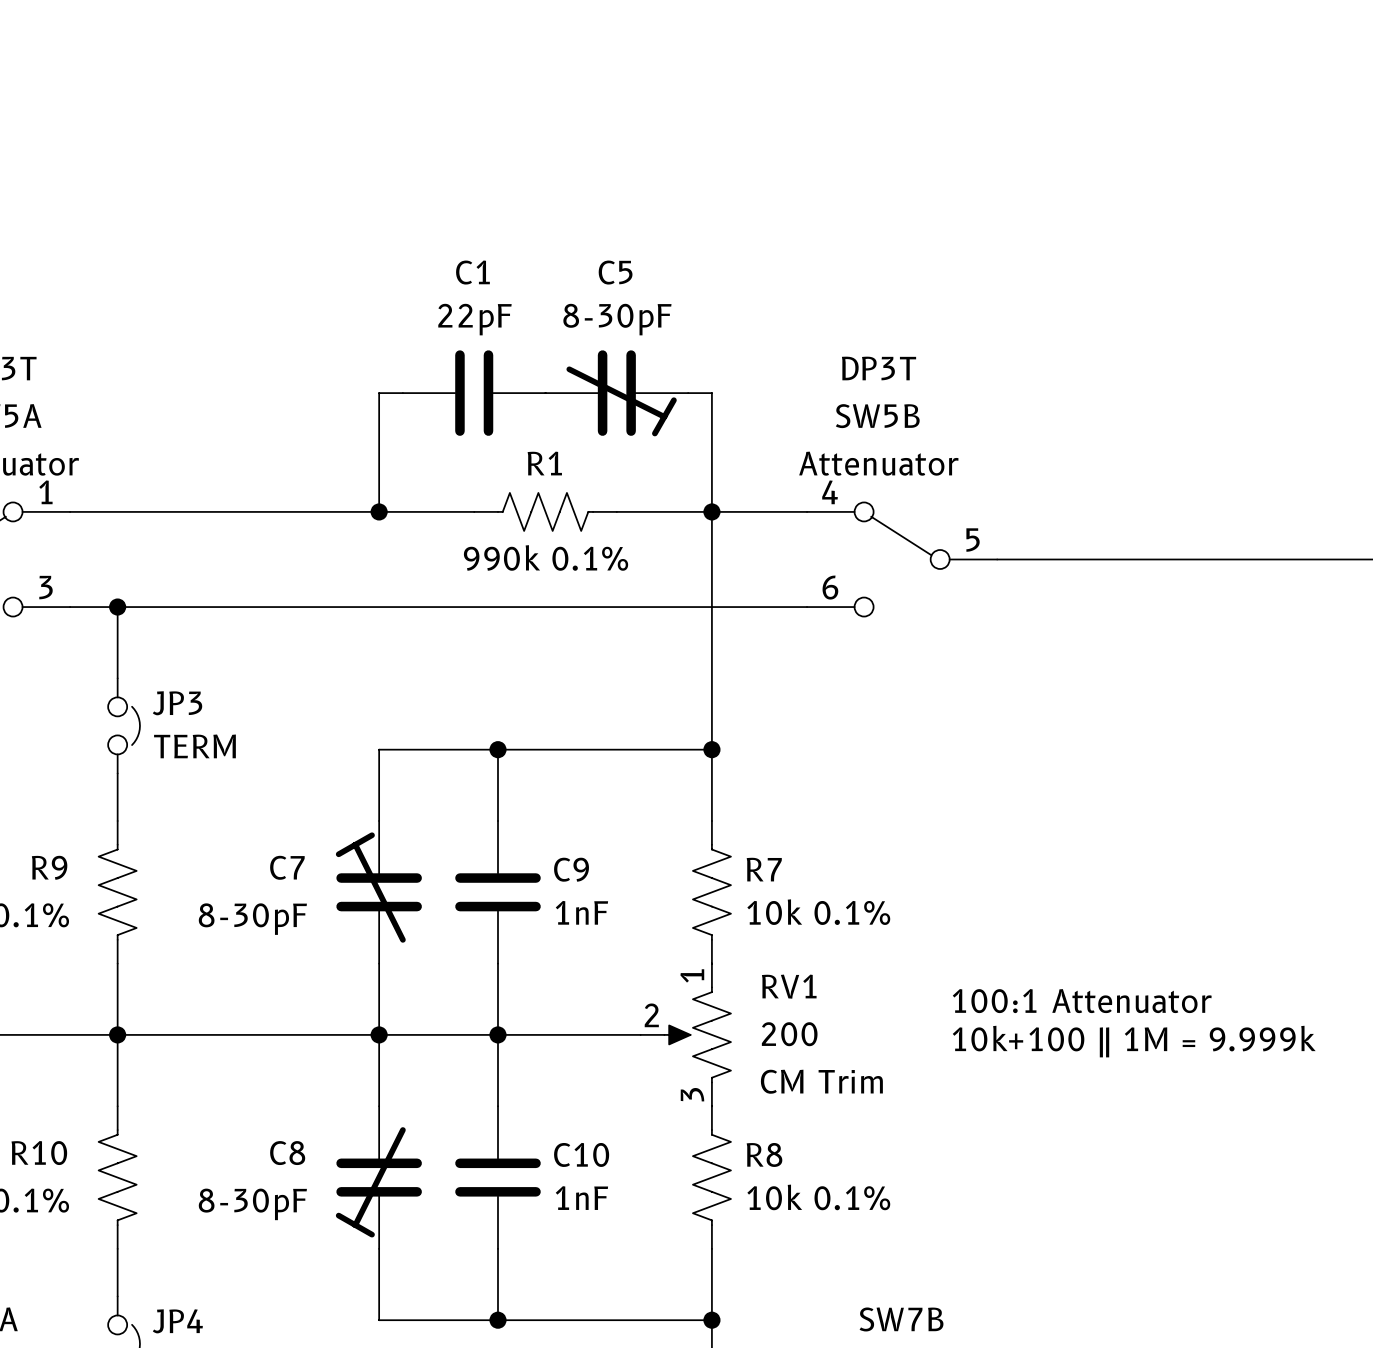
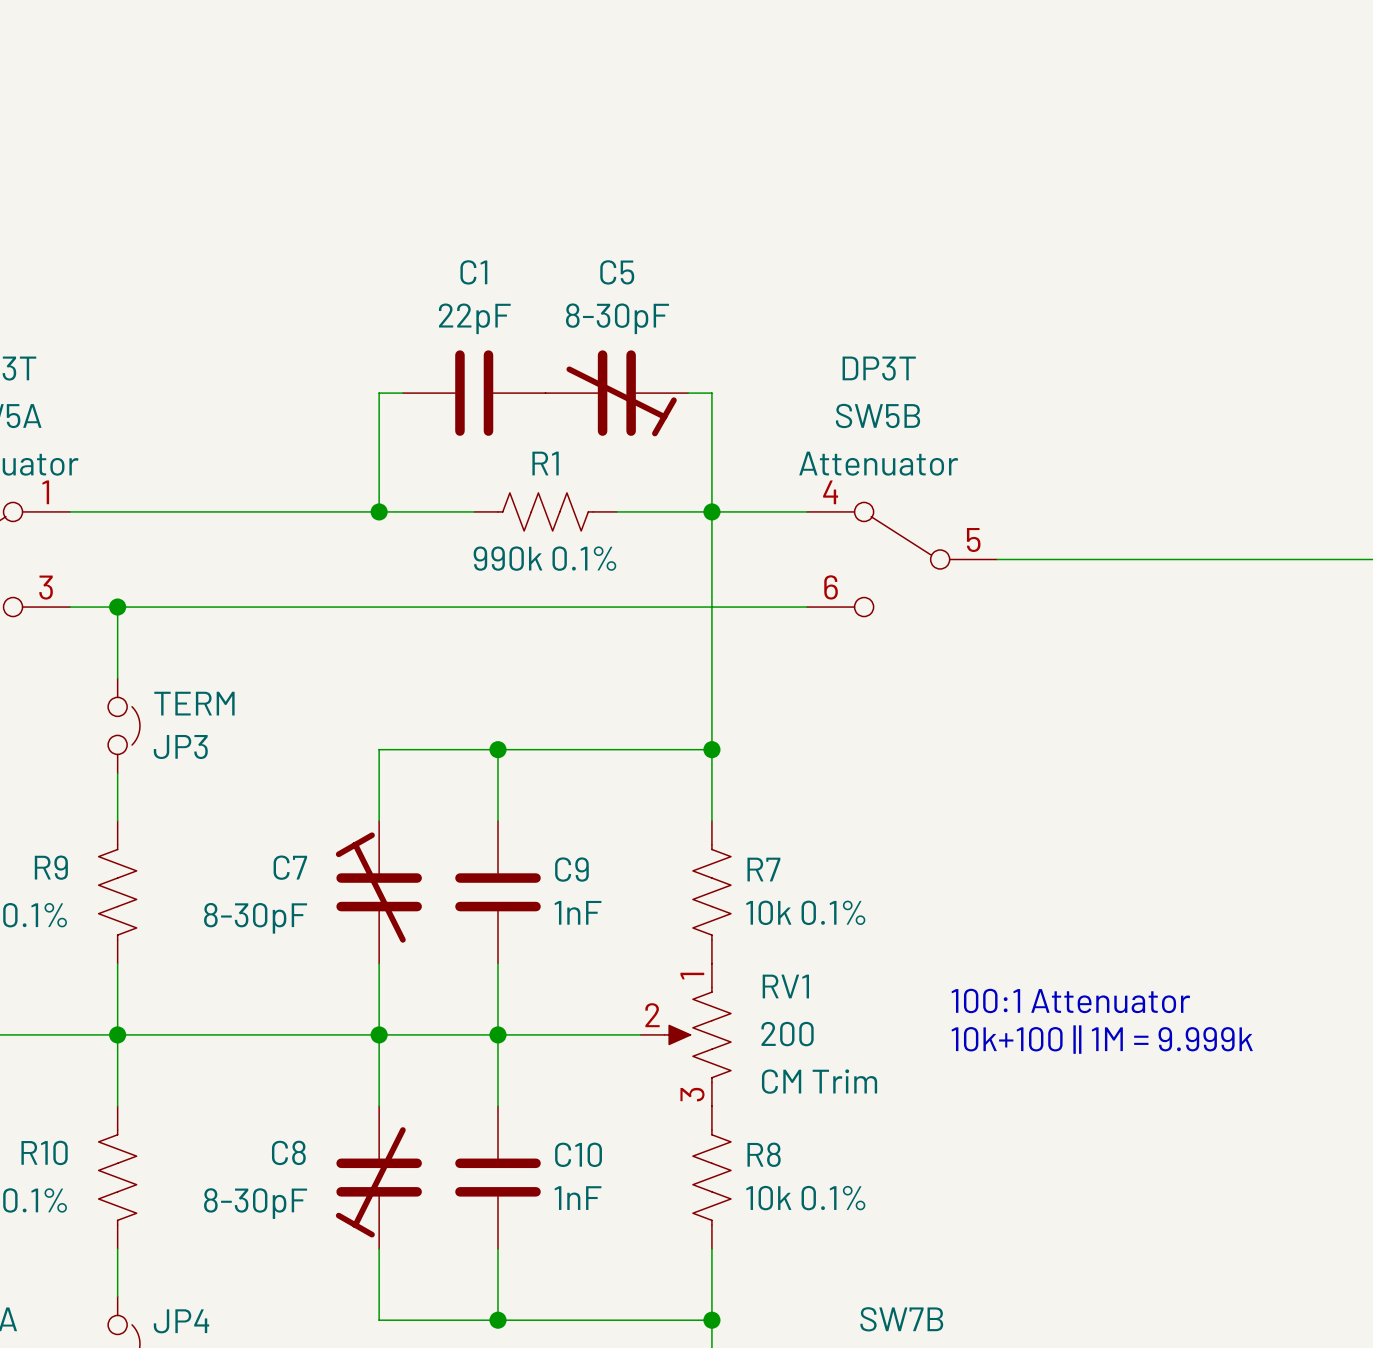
JP3 name position: JP3 (177, 703) -> JP3 (180, 747)
JP3 value position: TERM (194, 746) -> TERM (194, 703)

